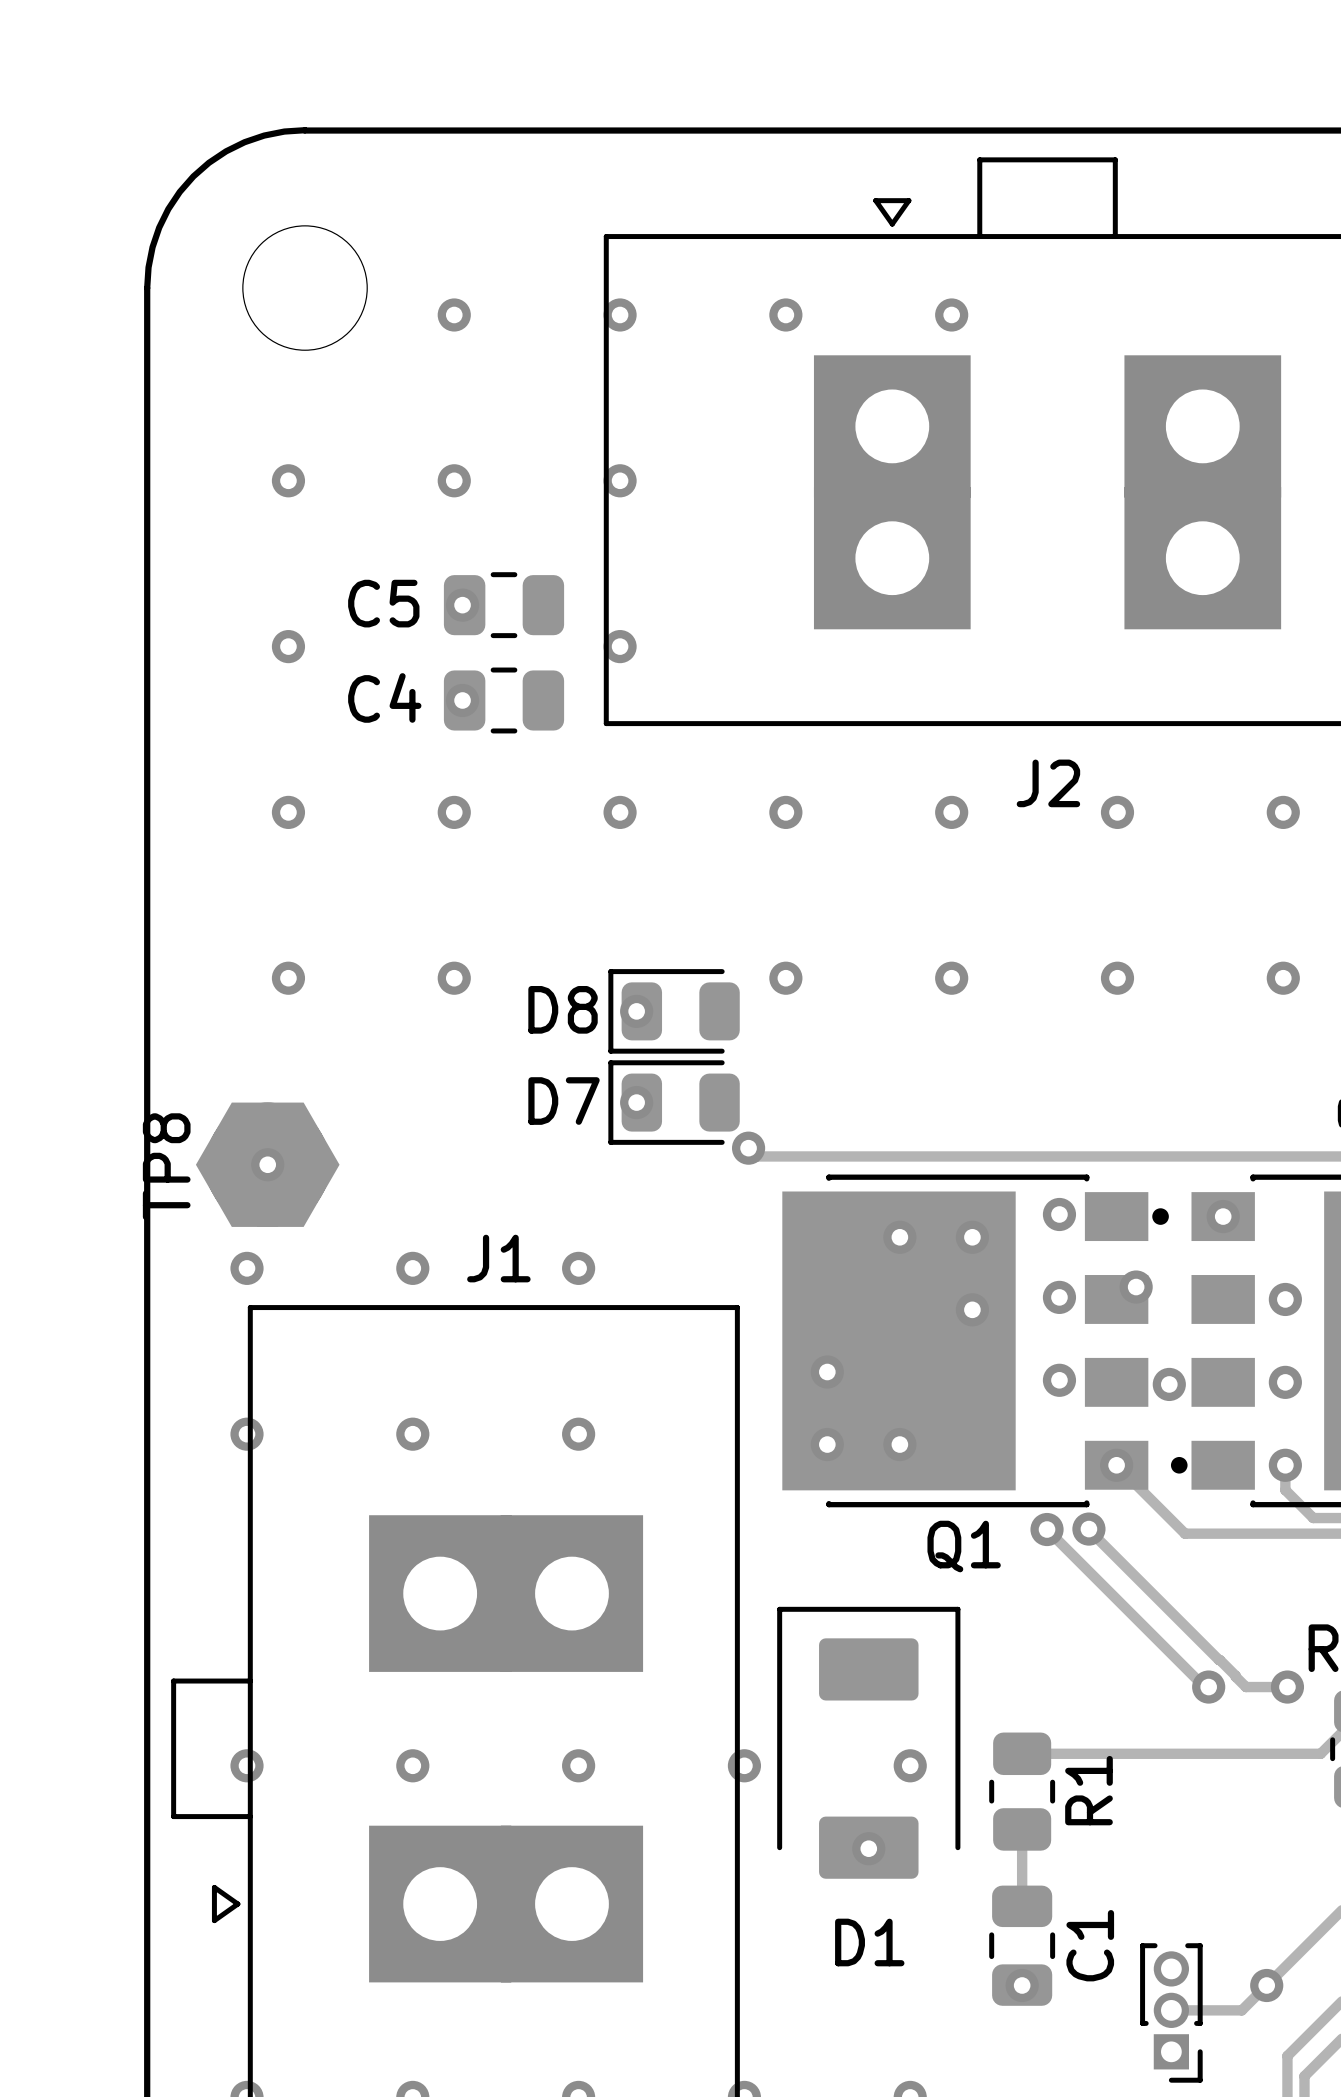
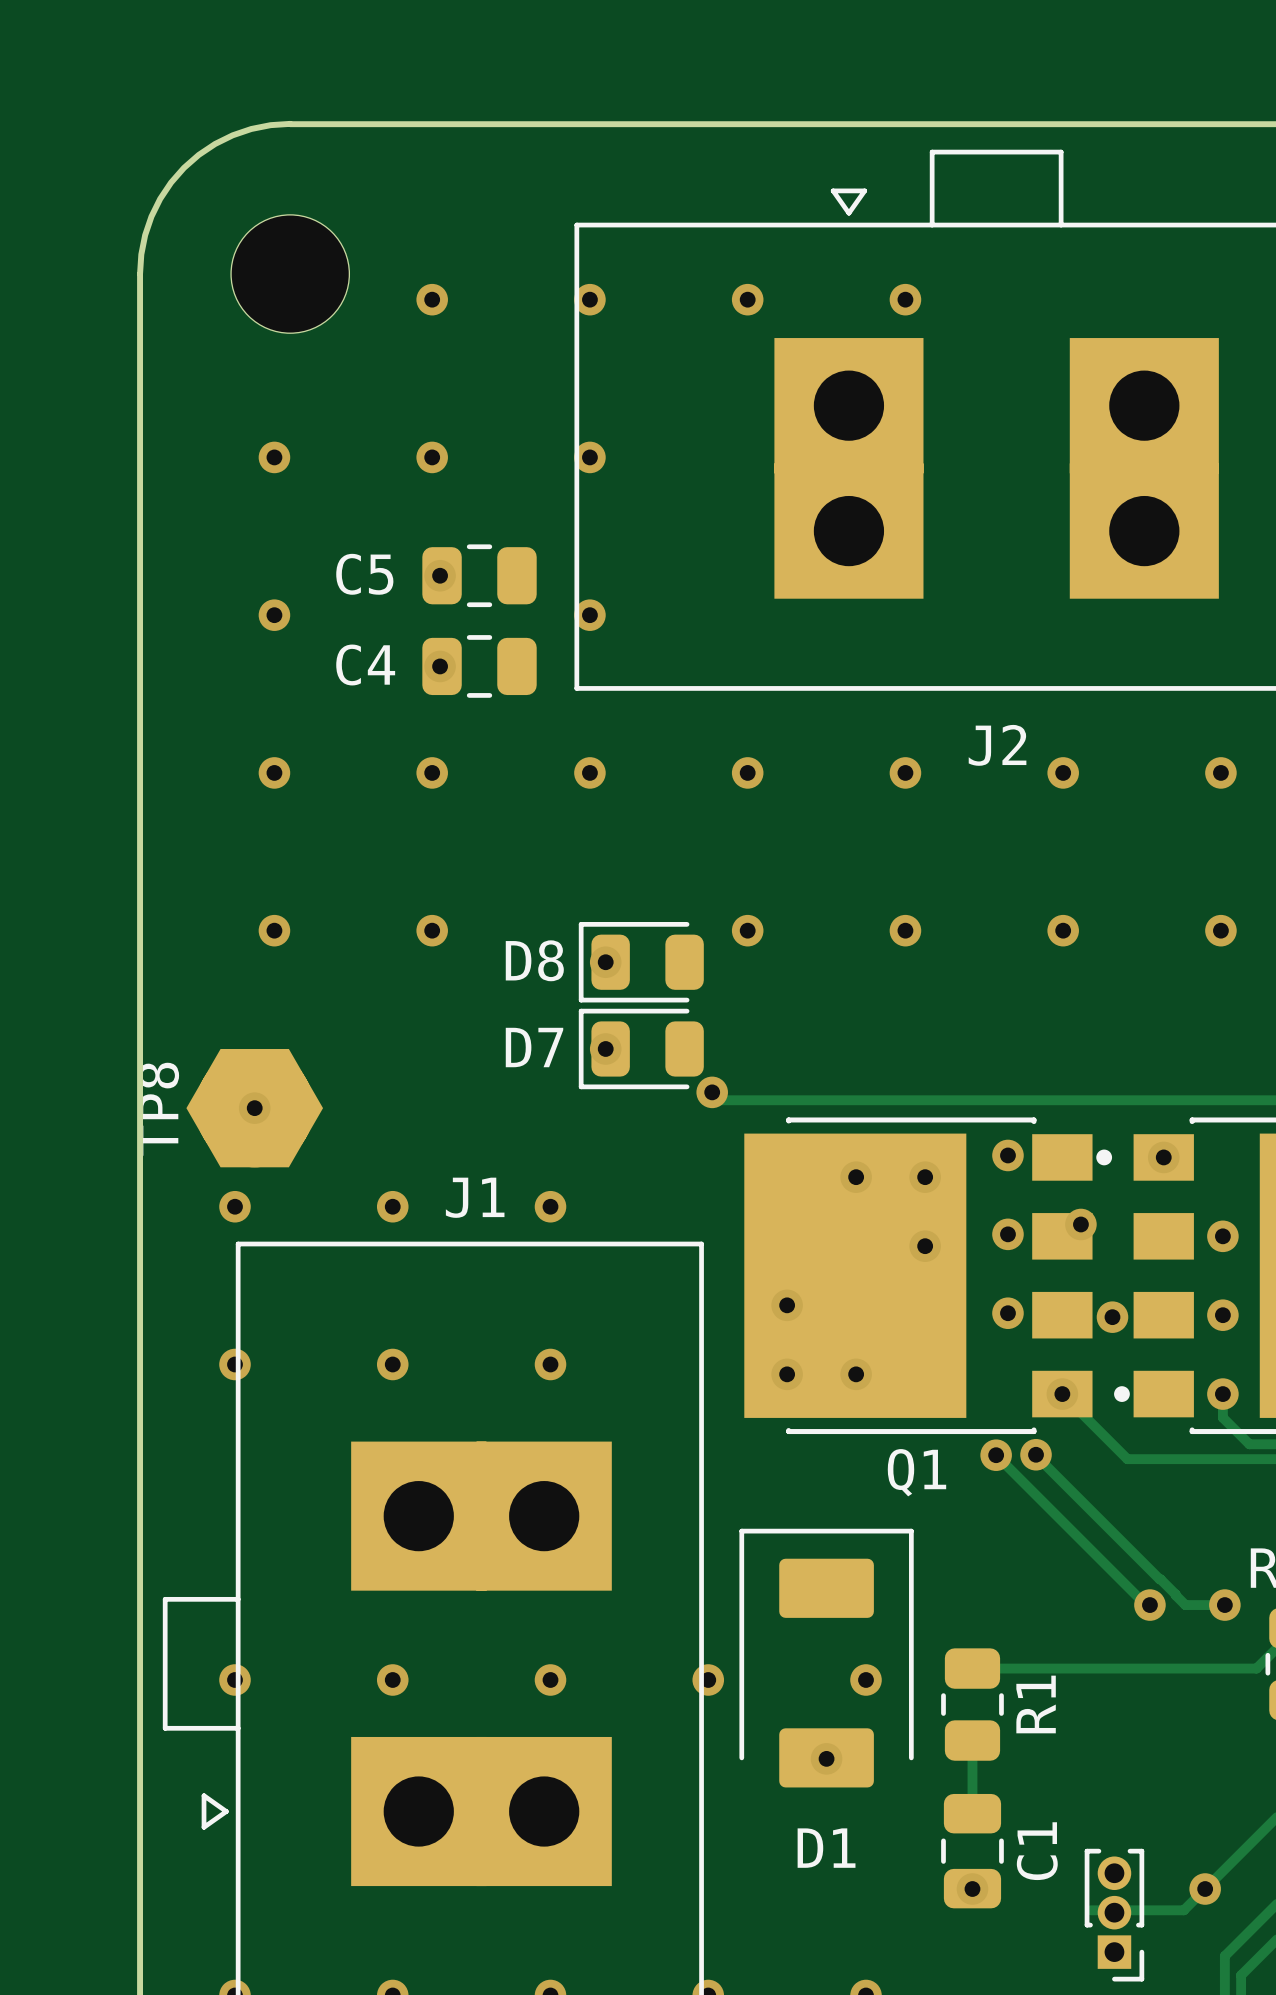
track: (1244, 2007) (1241, 2010) (1171, 2010) -> (1183, 1910) (1090, 1910)

